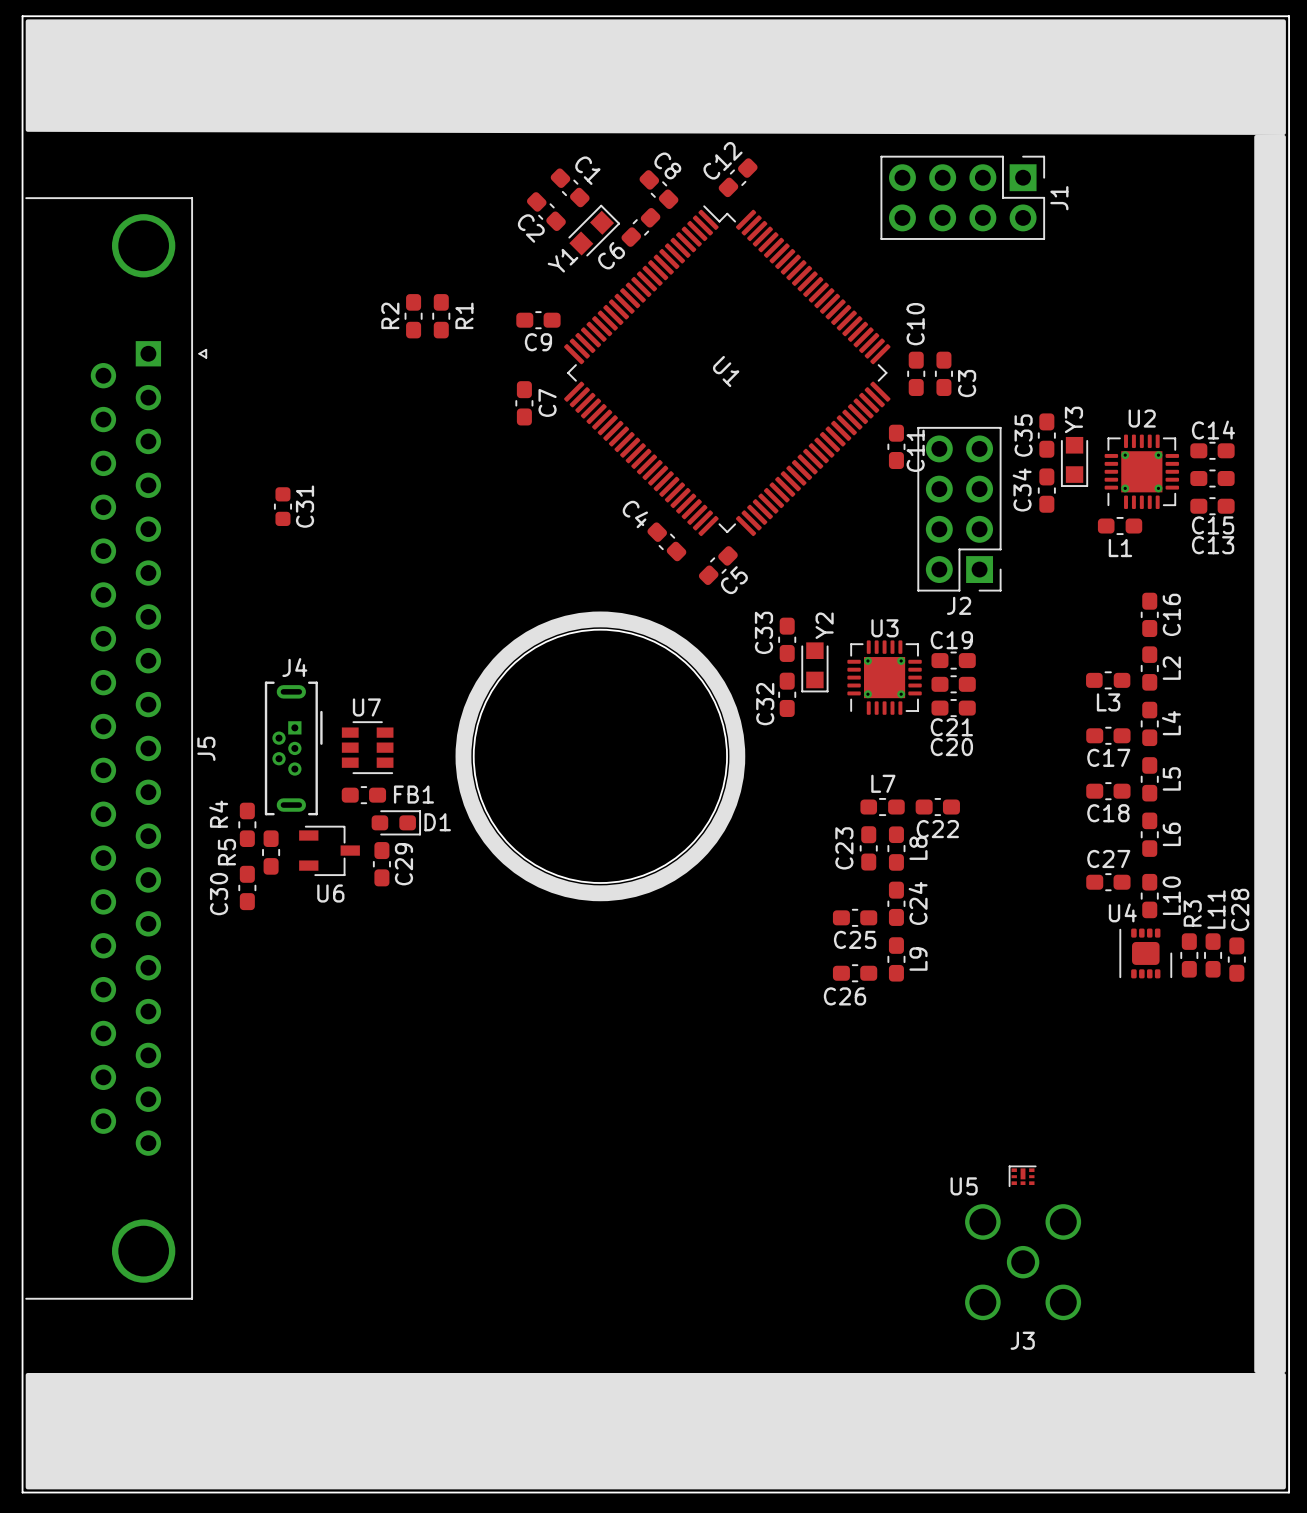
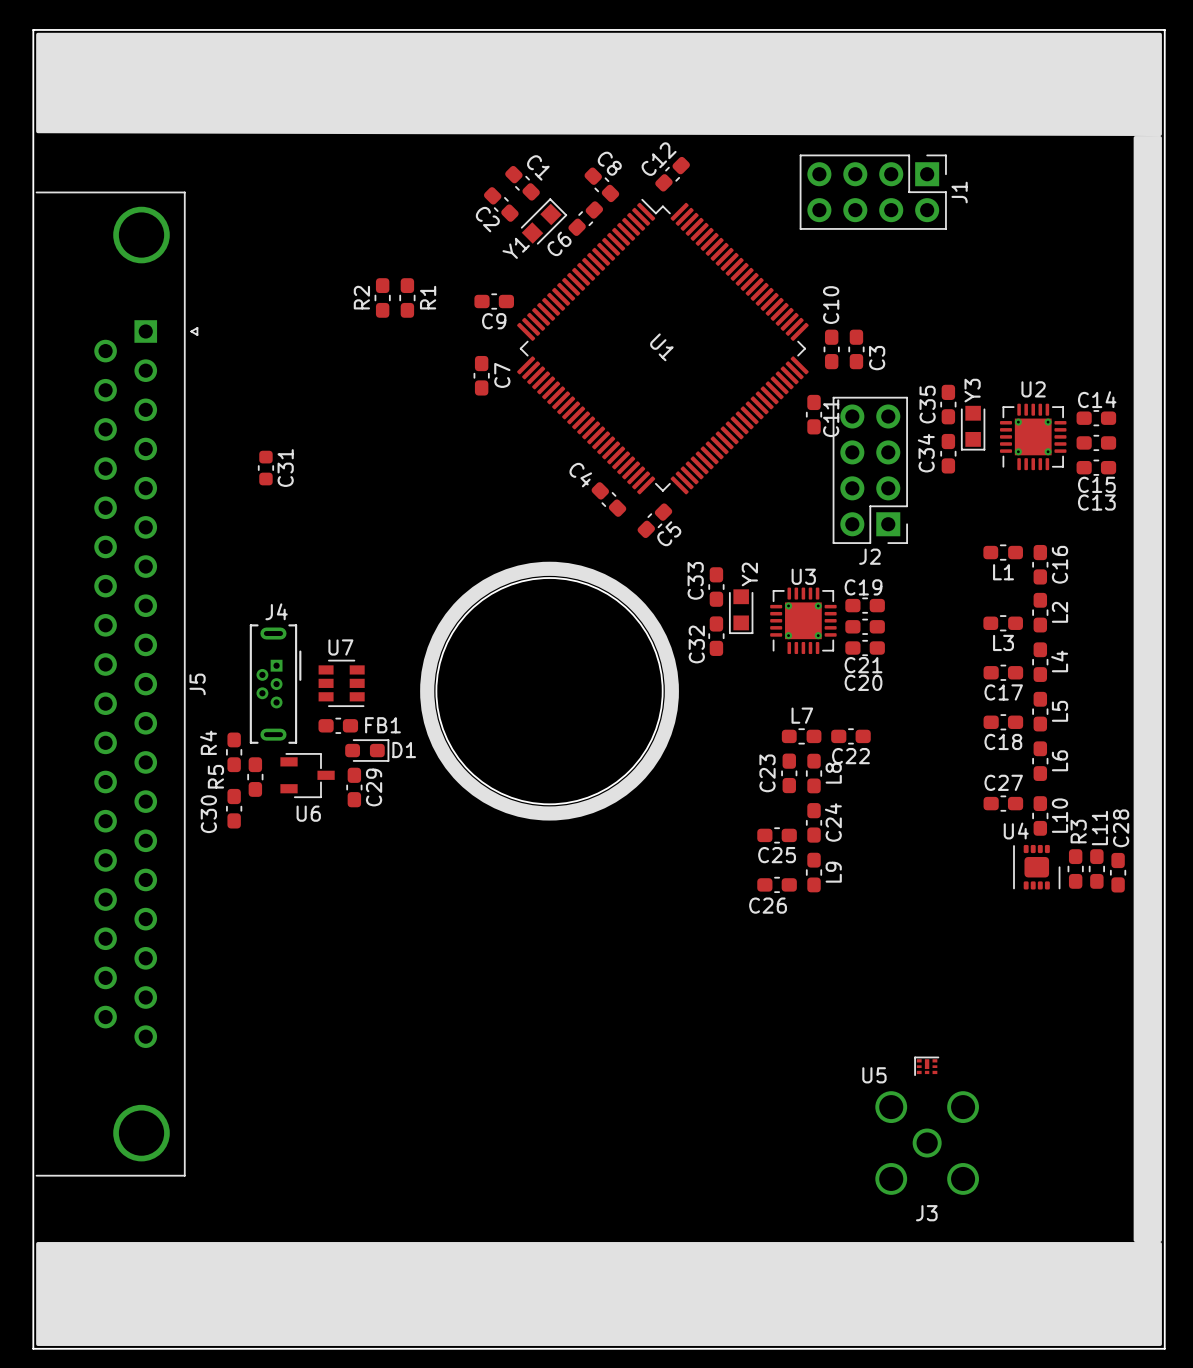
L1 position: (1120, 526) -> (1003, 552)

